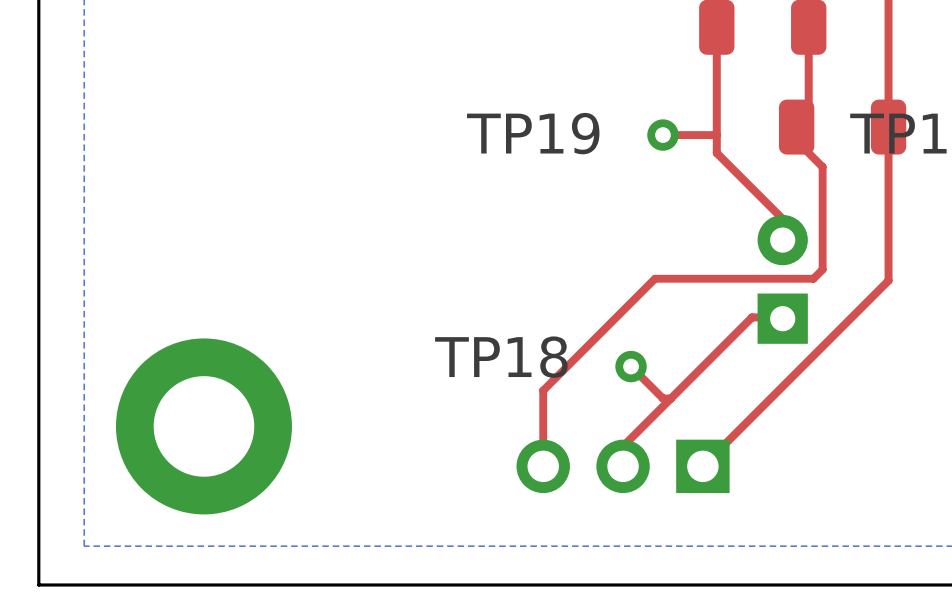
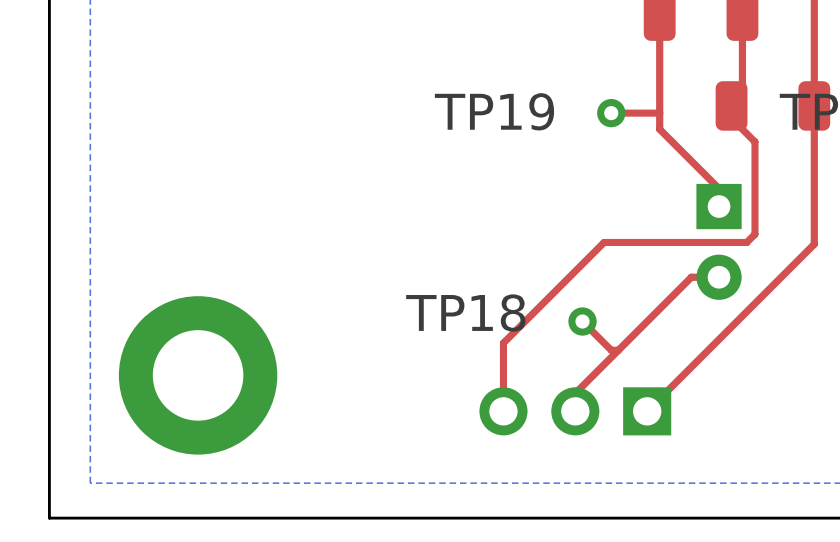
part rotation: 0° (782, 279) -> 180° (719, 241)

